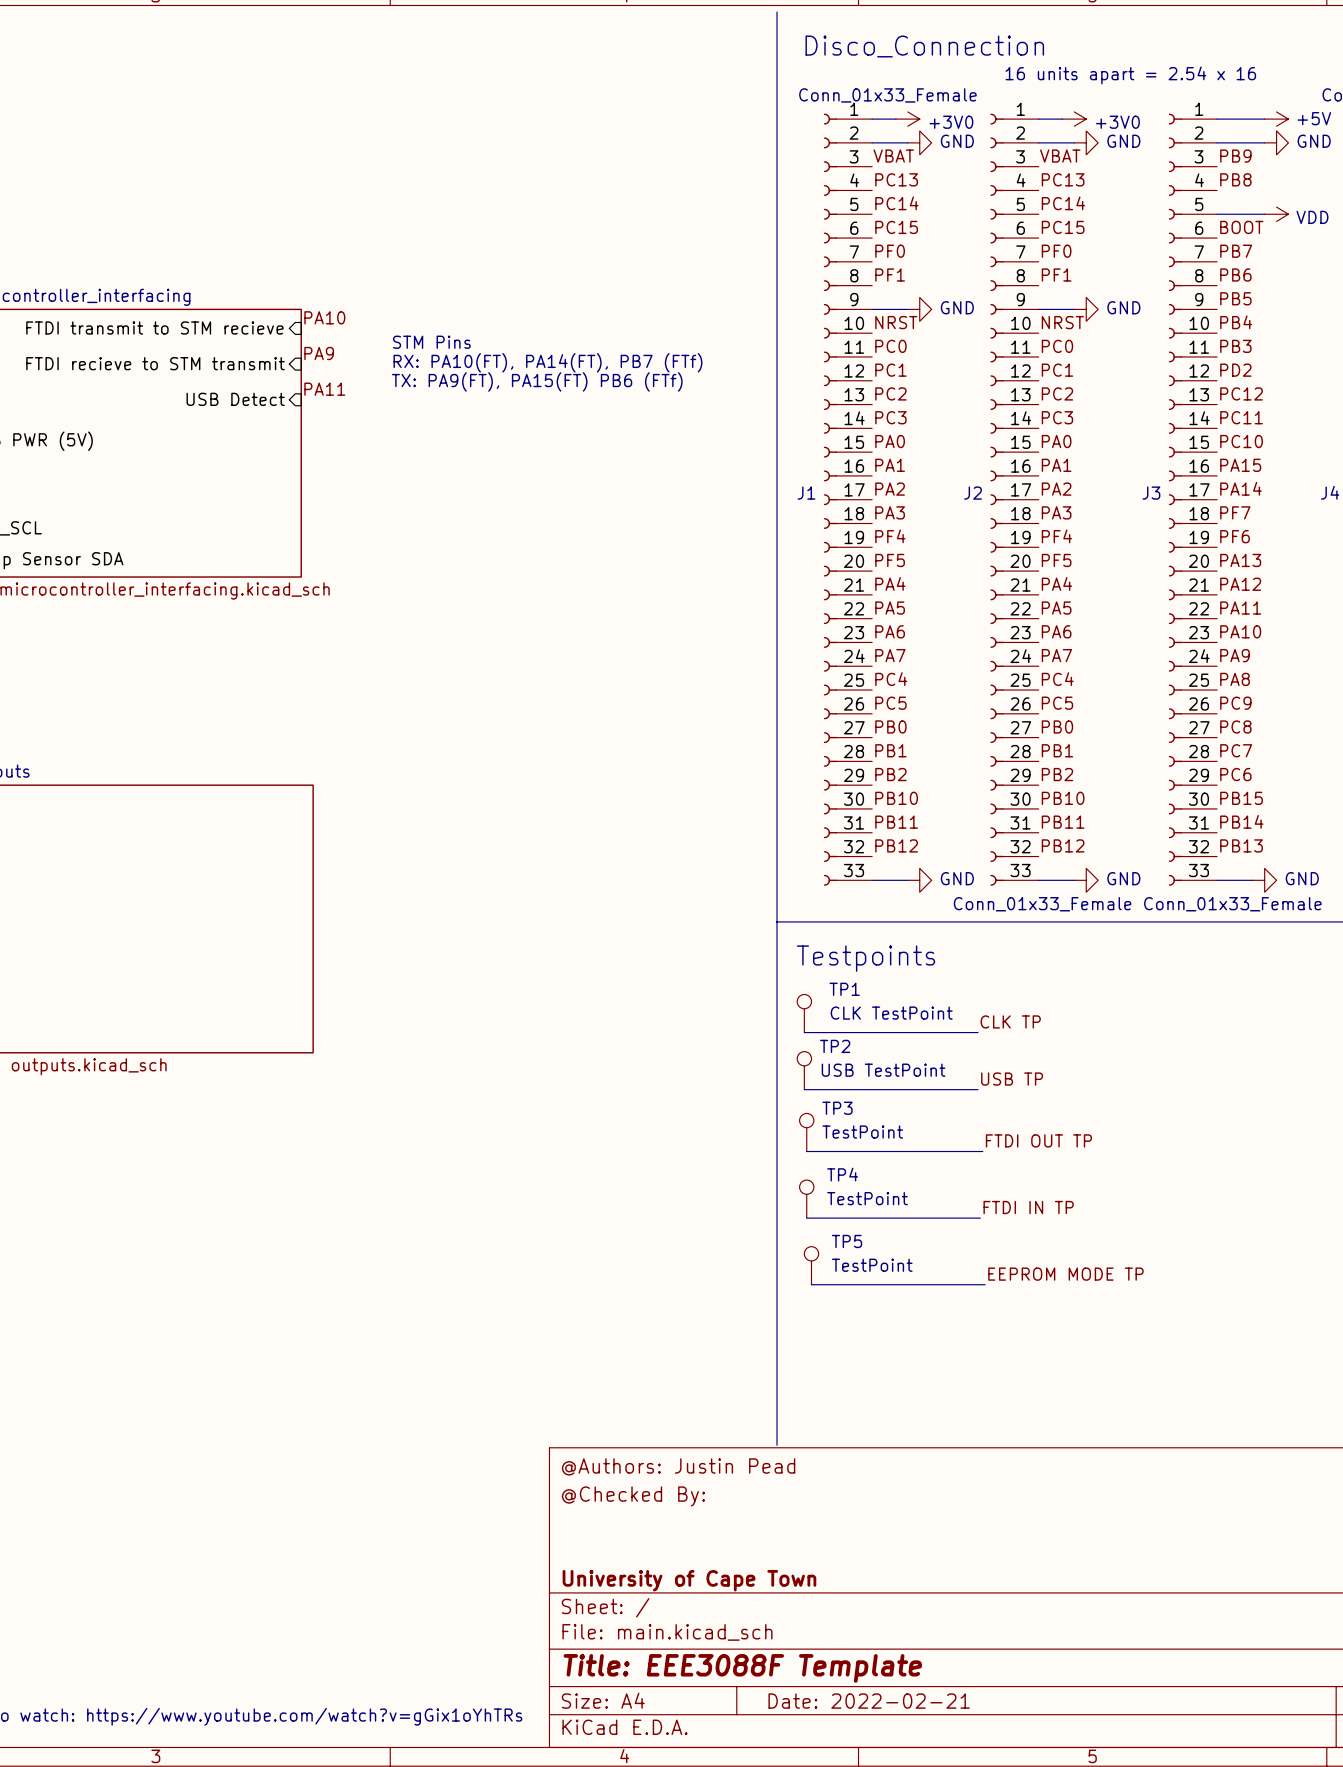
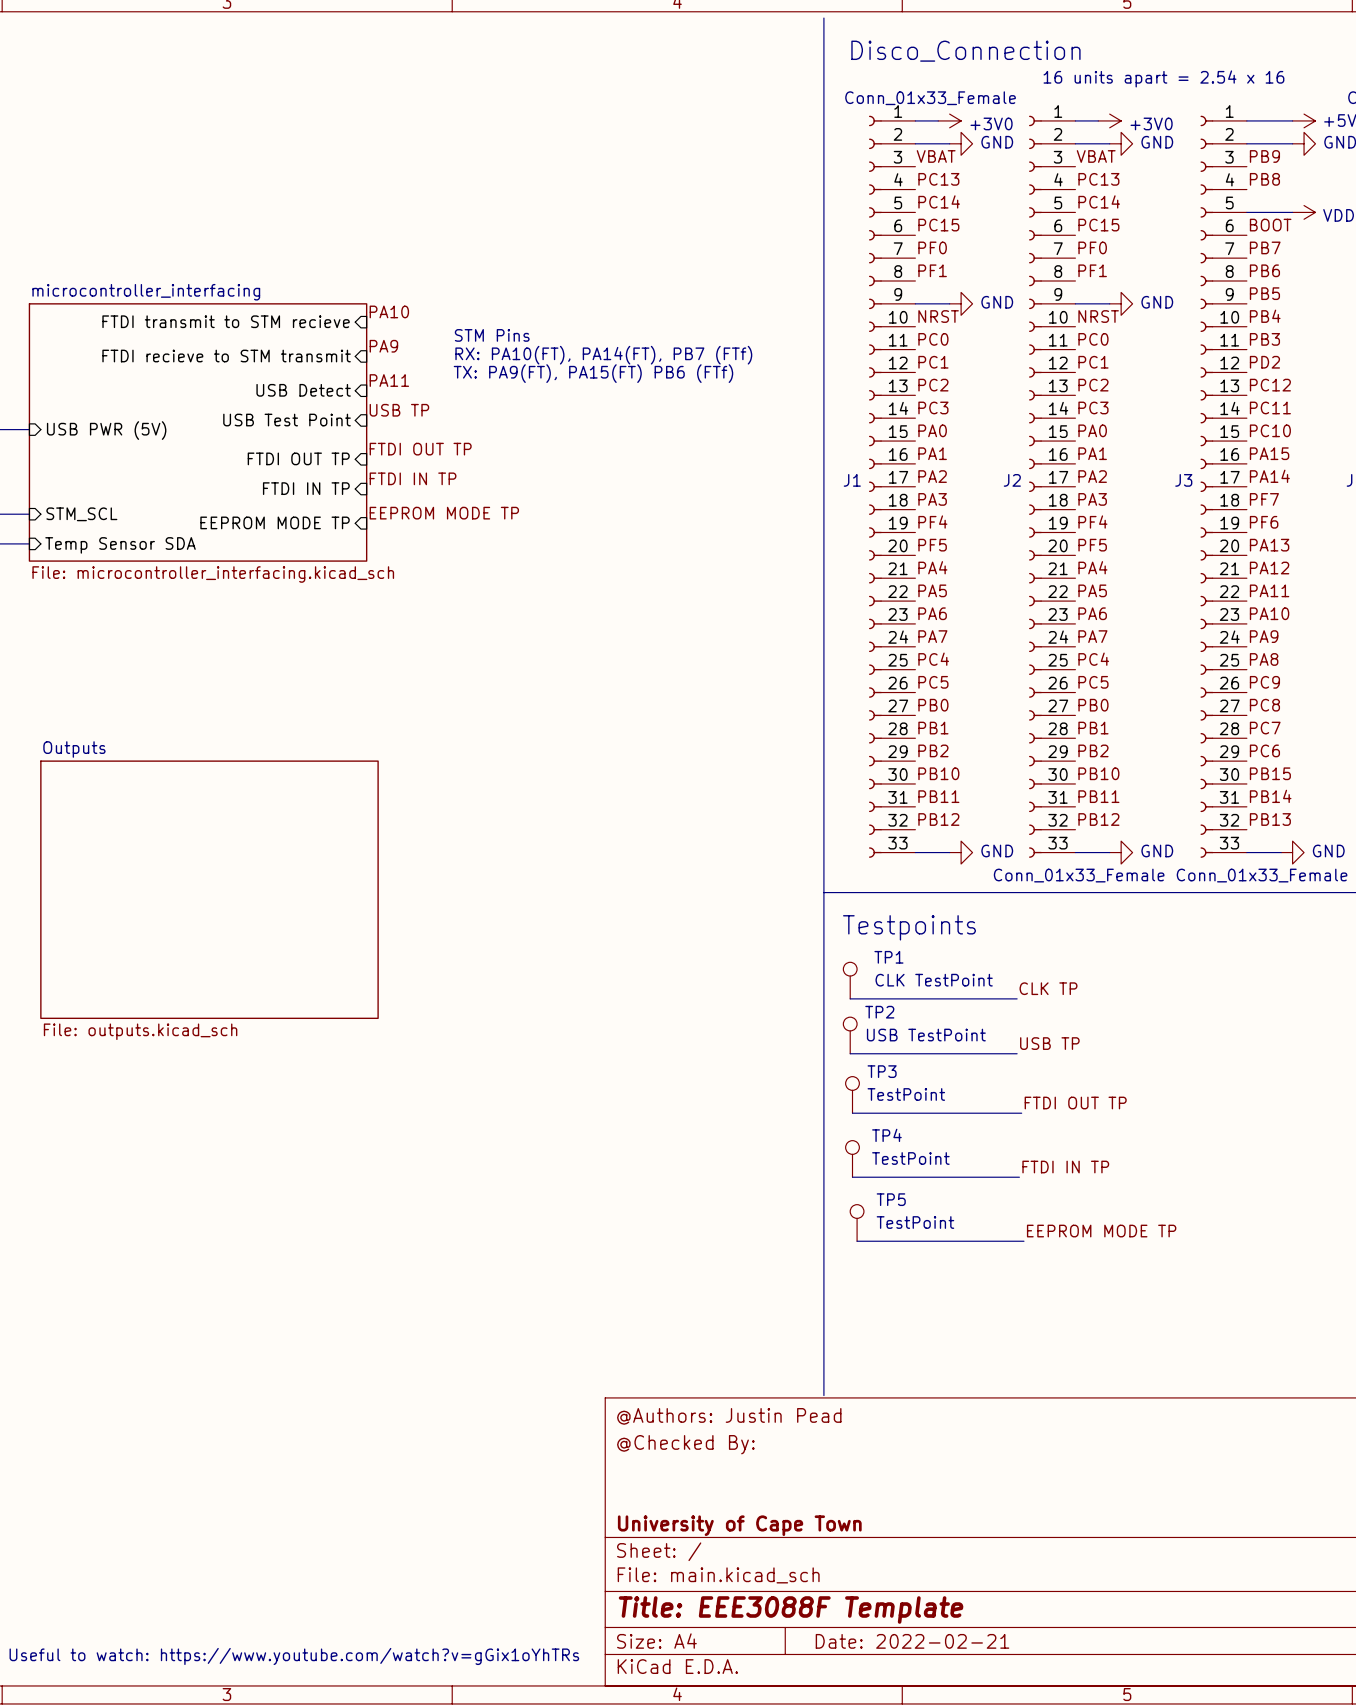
label: none -> USB TP (399, 410)
sheet pin: none -> USB Test Point (287, 420)
label: none -> FTDI OUT TP (420, 449)
sheet pin: none -> FTDI OUT TP (298, 458)
label: none -> FTDI IN TP (413, 478)
sheet pin: none -> FTDI IN TP (306, 488)
label: none -> EEPROM MODE TP (444, 513)
sheet pin: none -> EEPROM MODE TP (275, 522)

